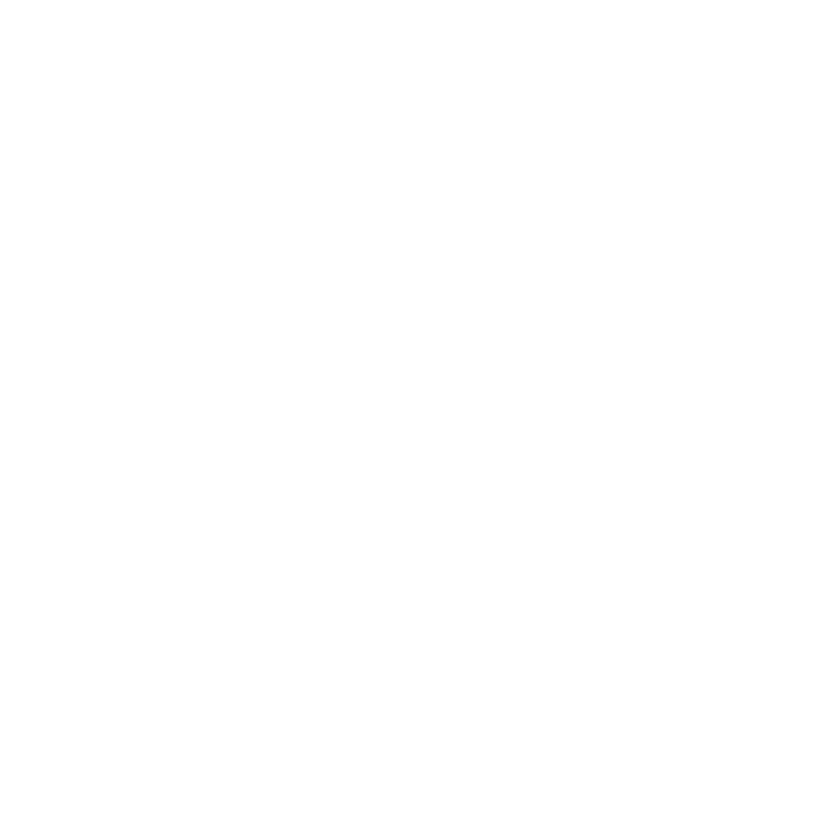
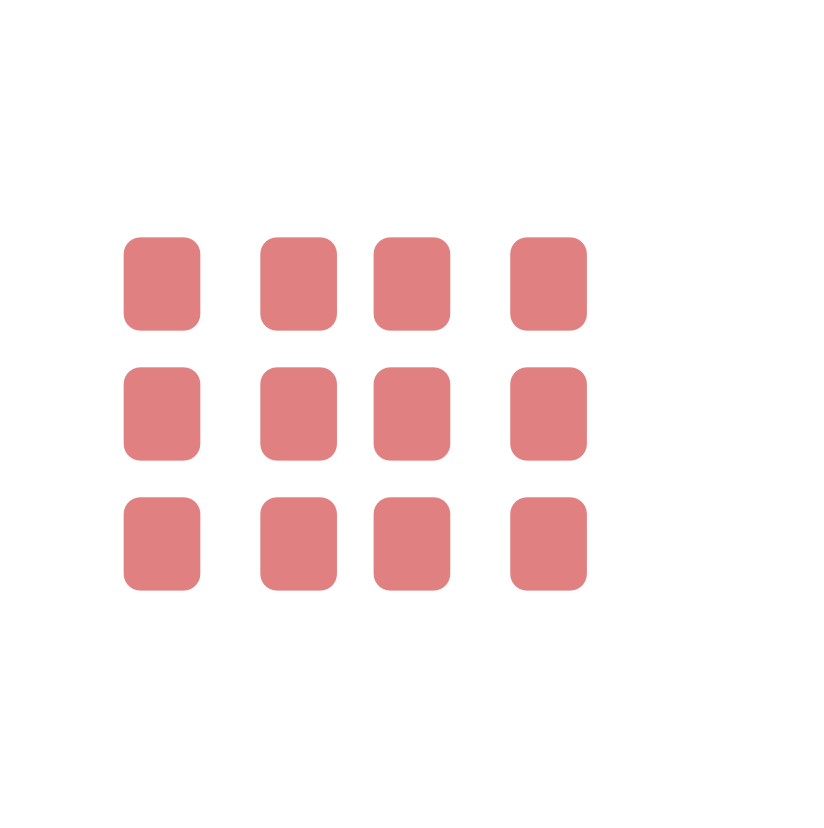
part: none -> (230, 284)
part: none -> (480, 284)
part: none -> (230, 413)
part: none -> (480, 413)
part: none -> (230, 543)
part: none -> (480, 543)

